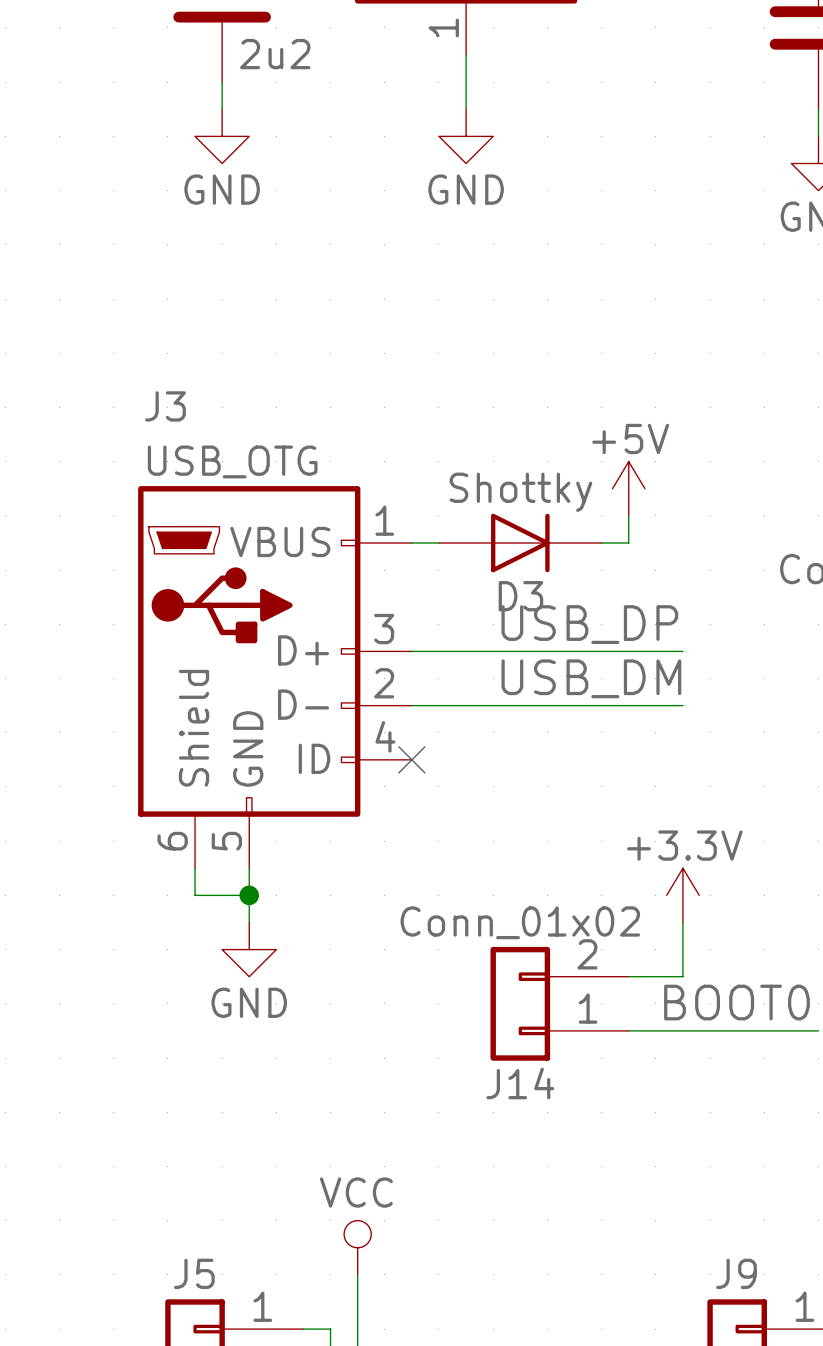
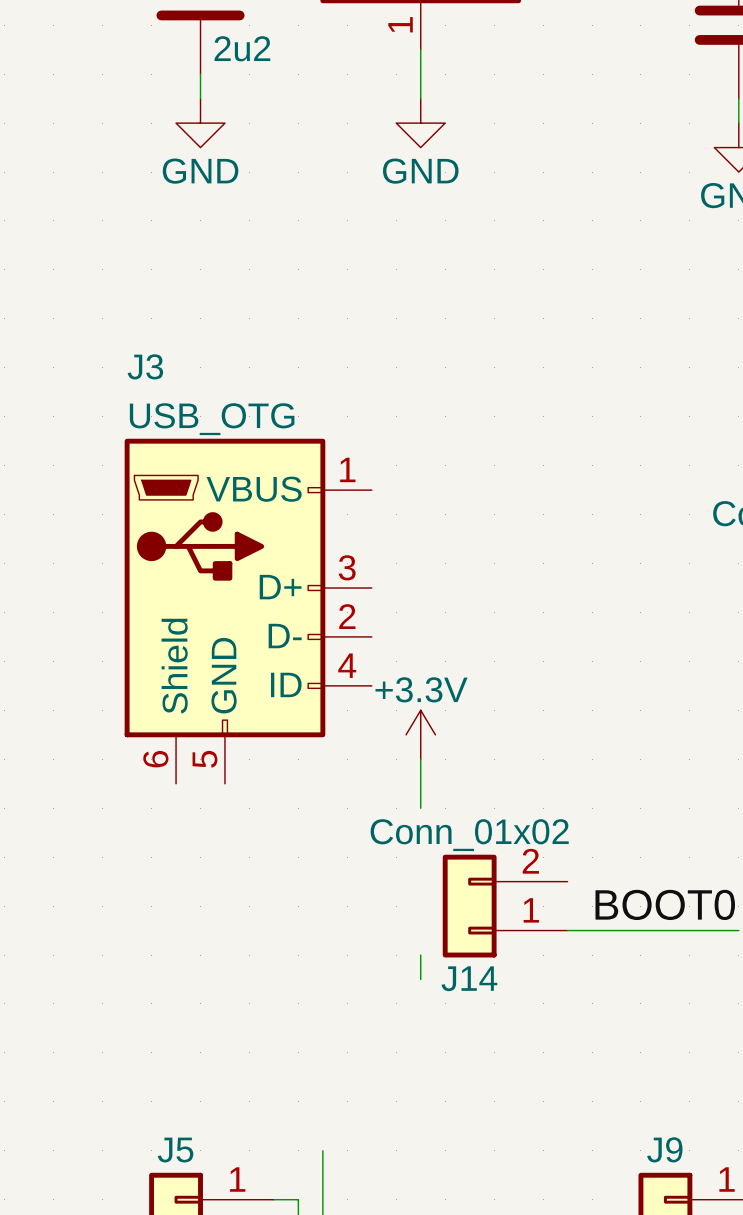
power symbol: +5V (628, 488) -> none
wire: (628, 515) (628, 542) (601, 542) -> none
wire: (411, 542) (438, 542) -> none
D3: Shottky (520, 542) -> none
label: USB_DP (589, 624) -> none
wire: (411, 651) (682, 651) -> none
label: USB_DM (591, 678) -> none
wire: (411, 705) (682, 705) -> none
no-connect mark: (411, 759) -> none
power symbol: none -> +3.3V (420, 734)
wire: (195, 868) (195, 895) (249, 895) -> none
wire: (249, 868) (249, 922) -> (420, 759) (420, 808)
junction: (249, 895) -> none
power symbol: +3.3V (682, 895) -> none
wire: (682, 922) (682, 976) (628, 976) -> none
power symbol: GND (249, 949) -> none
wire: none -> (420, 955) (420, 979)
power symbol: VCC (357, 1247) -> none

